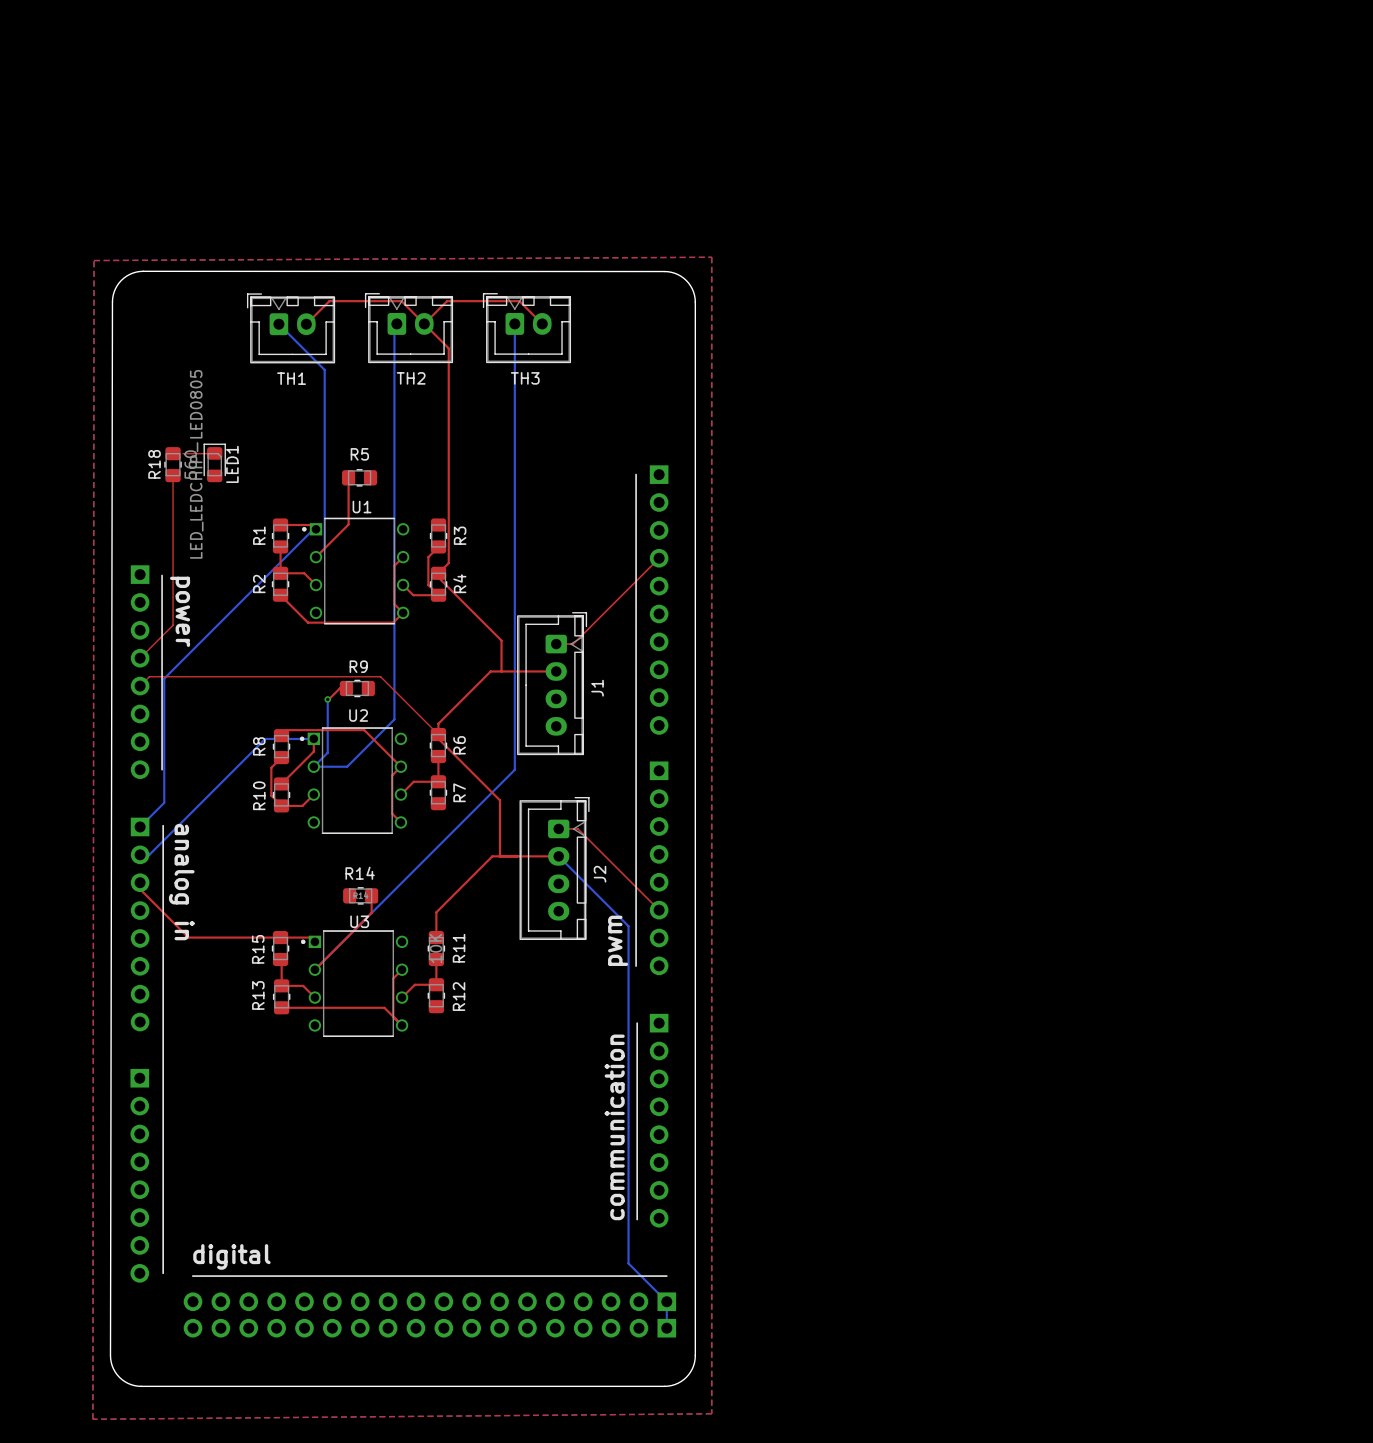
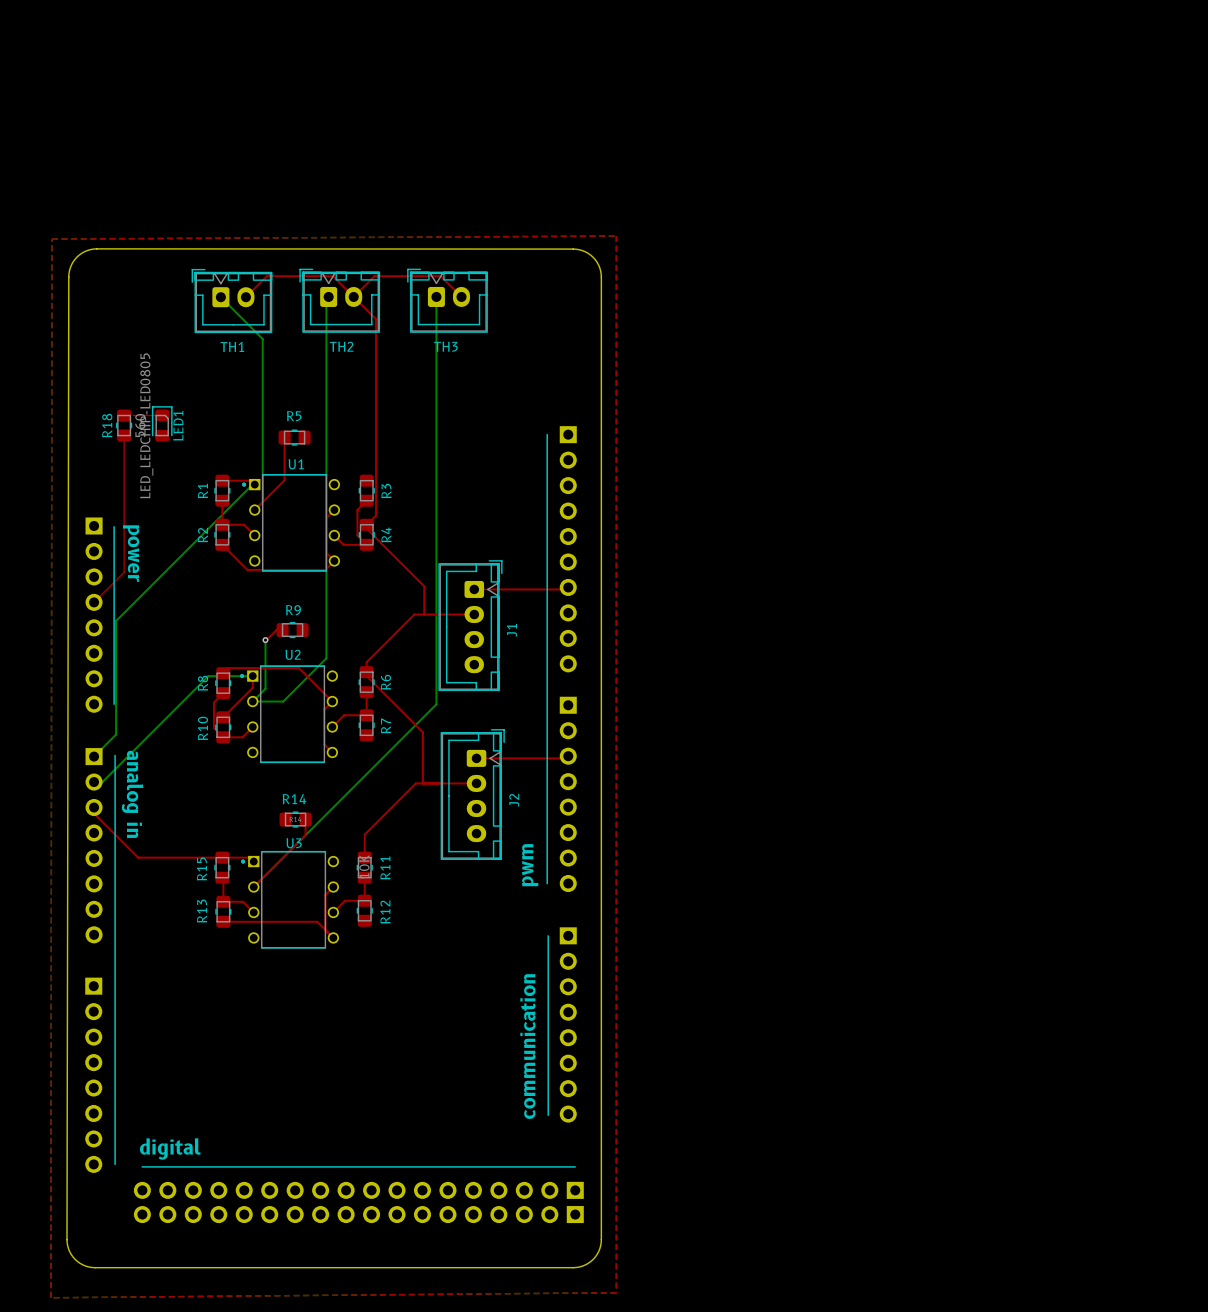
top track: (659, 558) (573, 644) -> (566, 589) (489, 589)
top track: (140, 686) (149, 676) (380, 676) (438, 734) -> none
top track: (577, 828) (659, 910) -> (494, 758) (566, 758)
bottom track: (558, 856) (628, 926) (628, 1263) (666, 1301) (666, 1328) -> none

